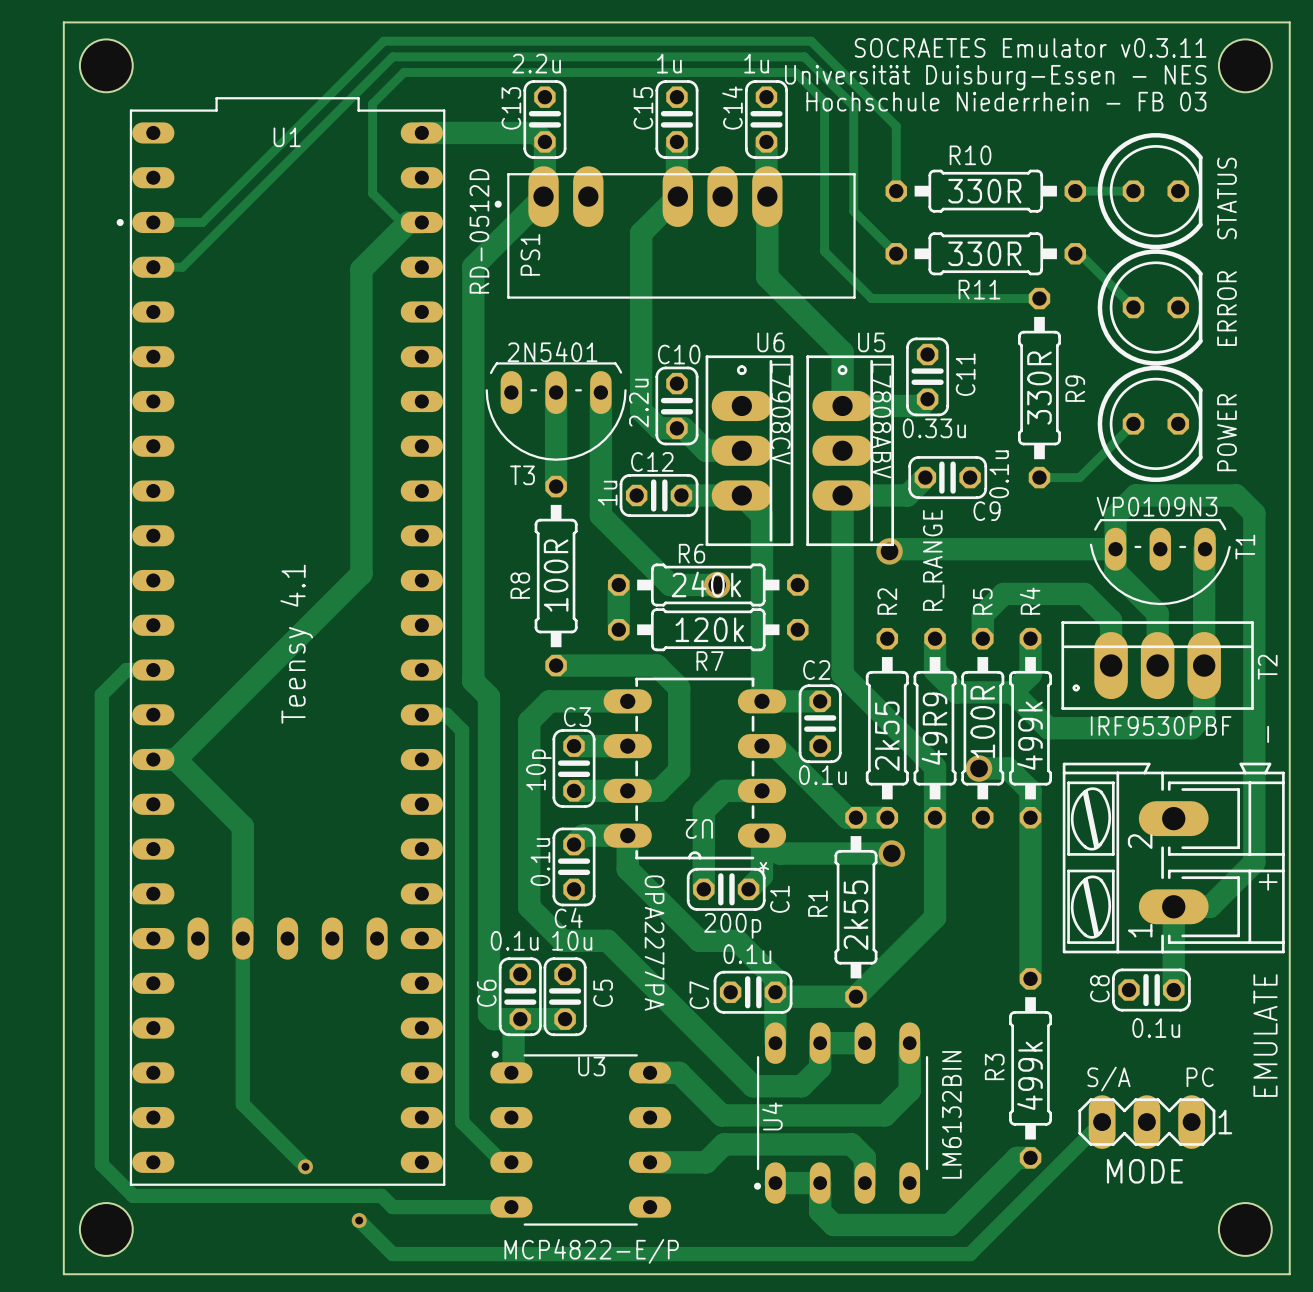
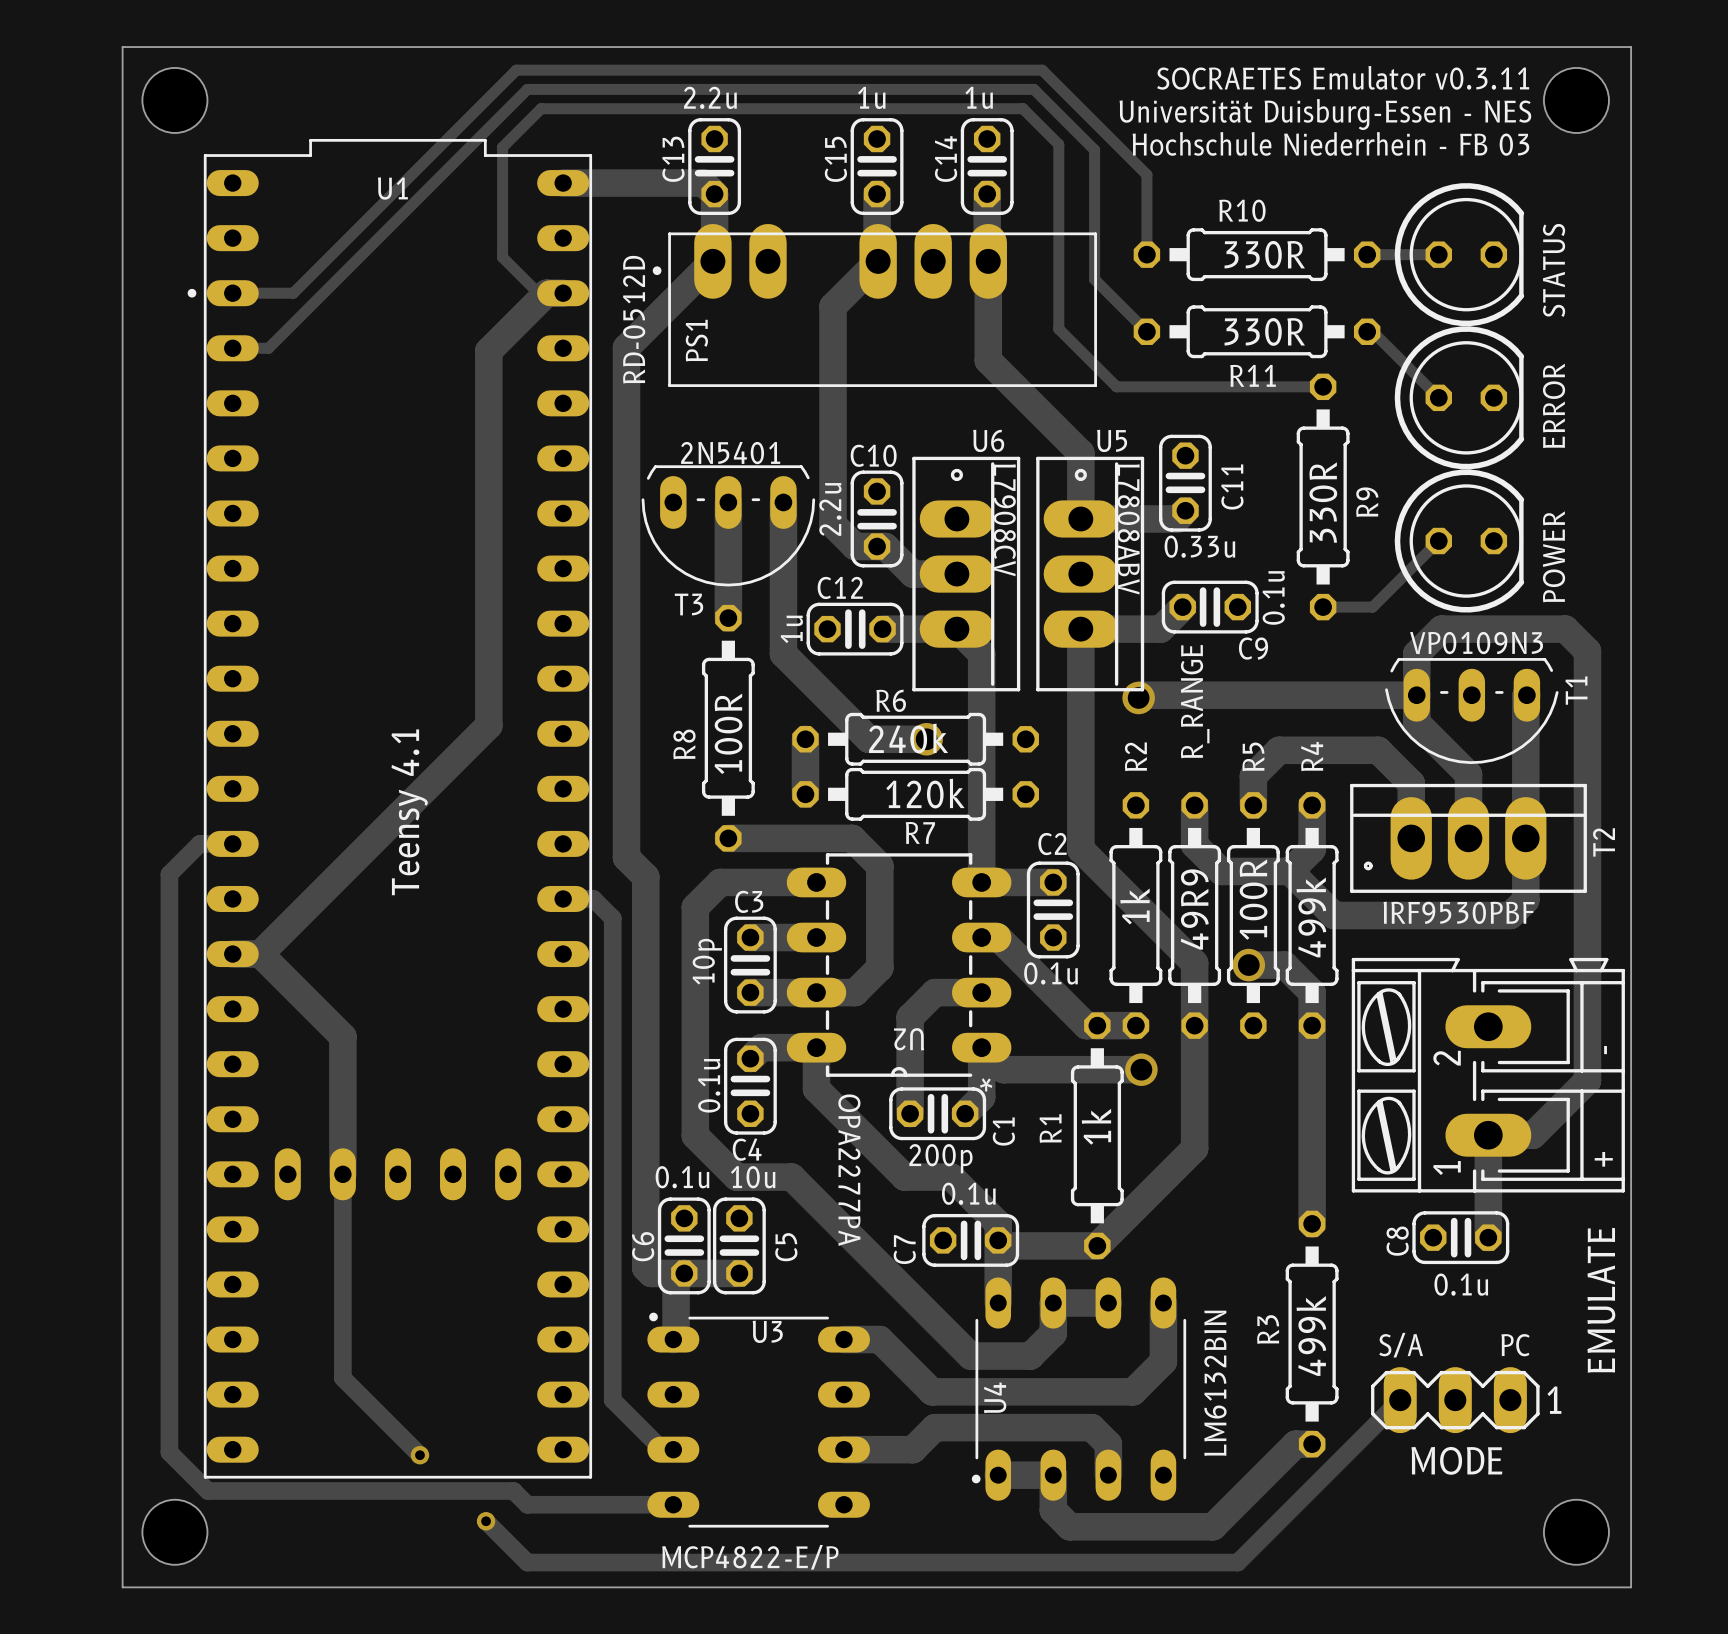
R2 value: 2k55 (887, 736) -> 1k (1134, 906)
R1 value: 2k55 (855, 915) -> 1k (1096, 1126)

